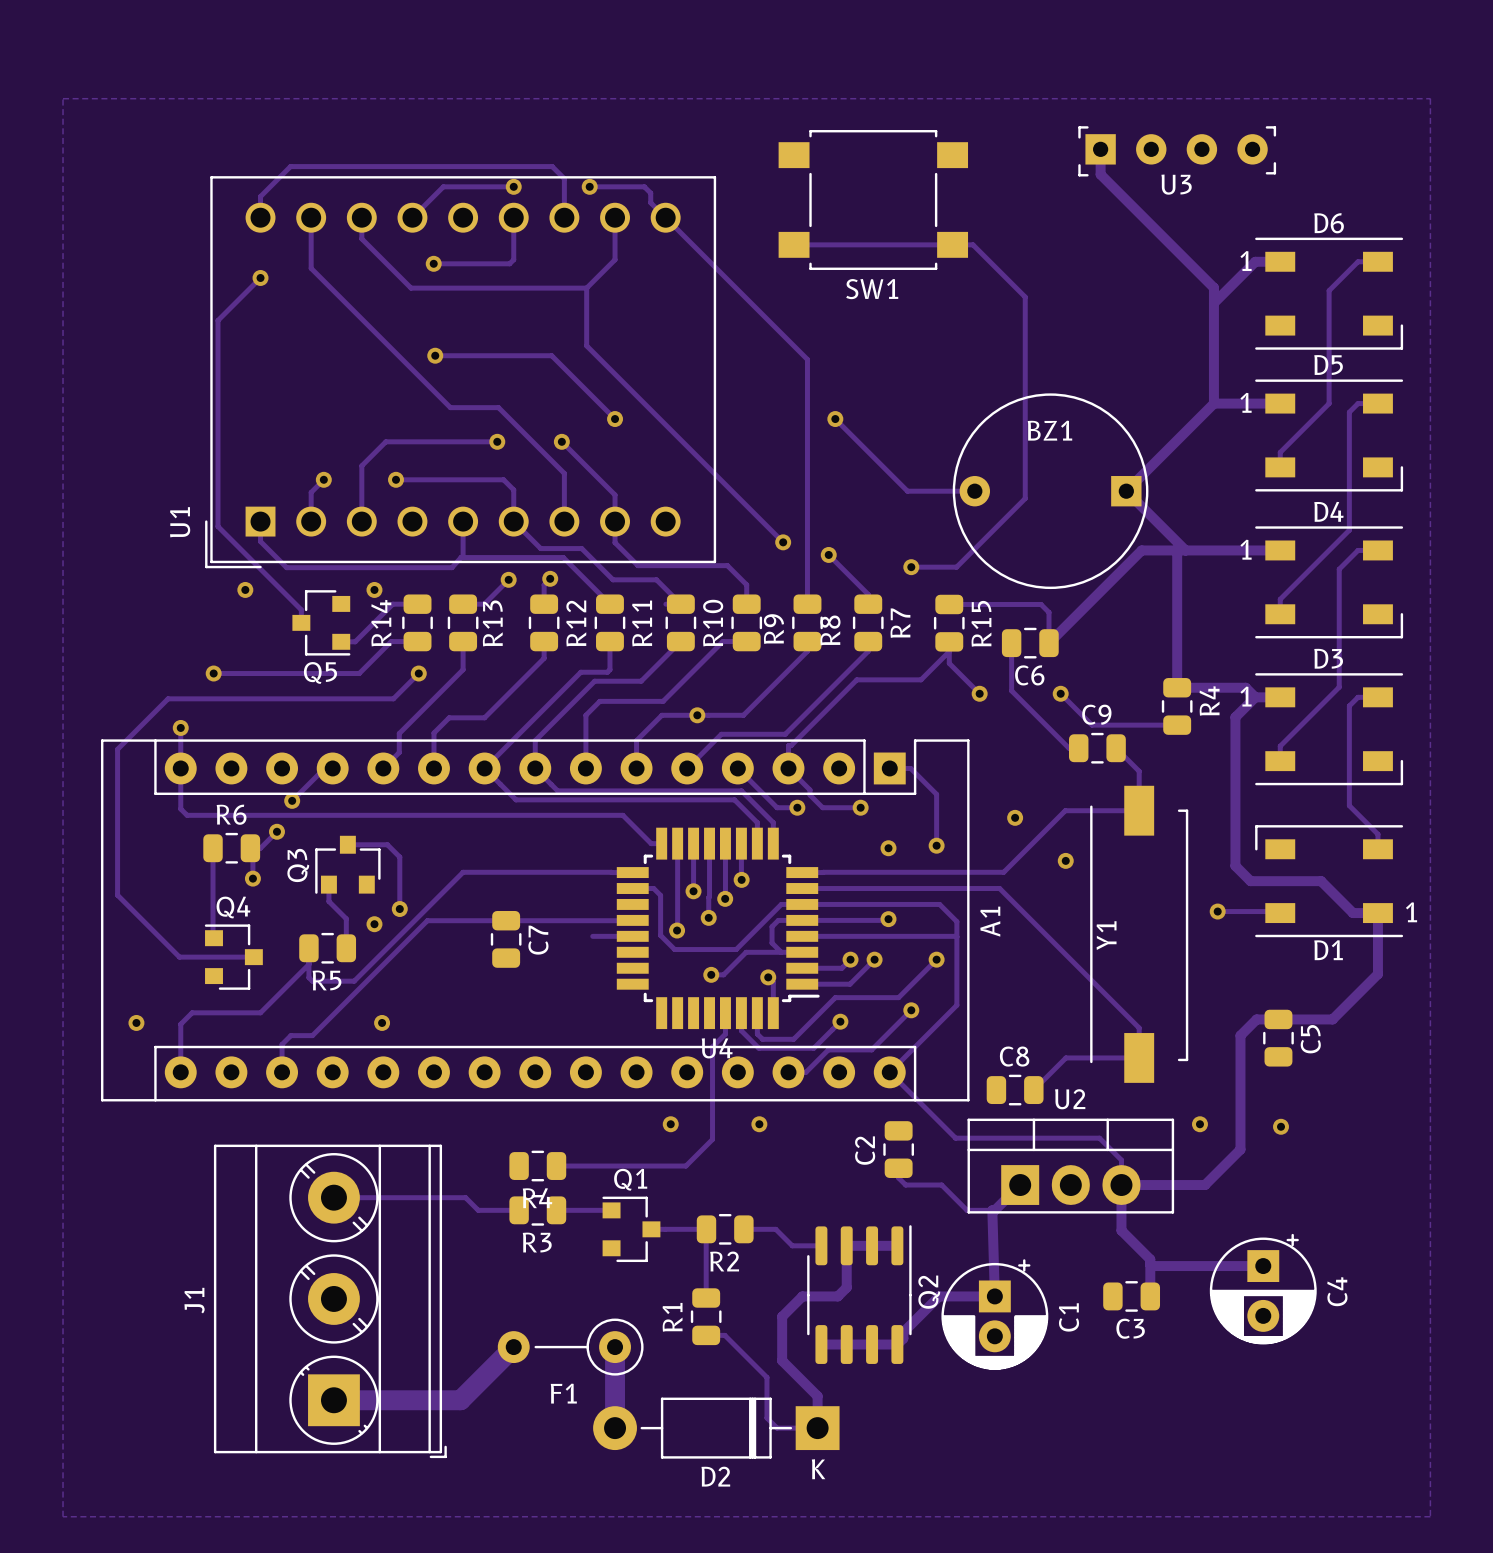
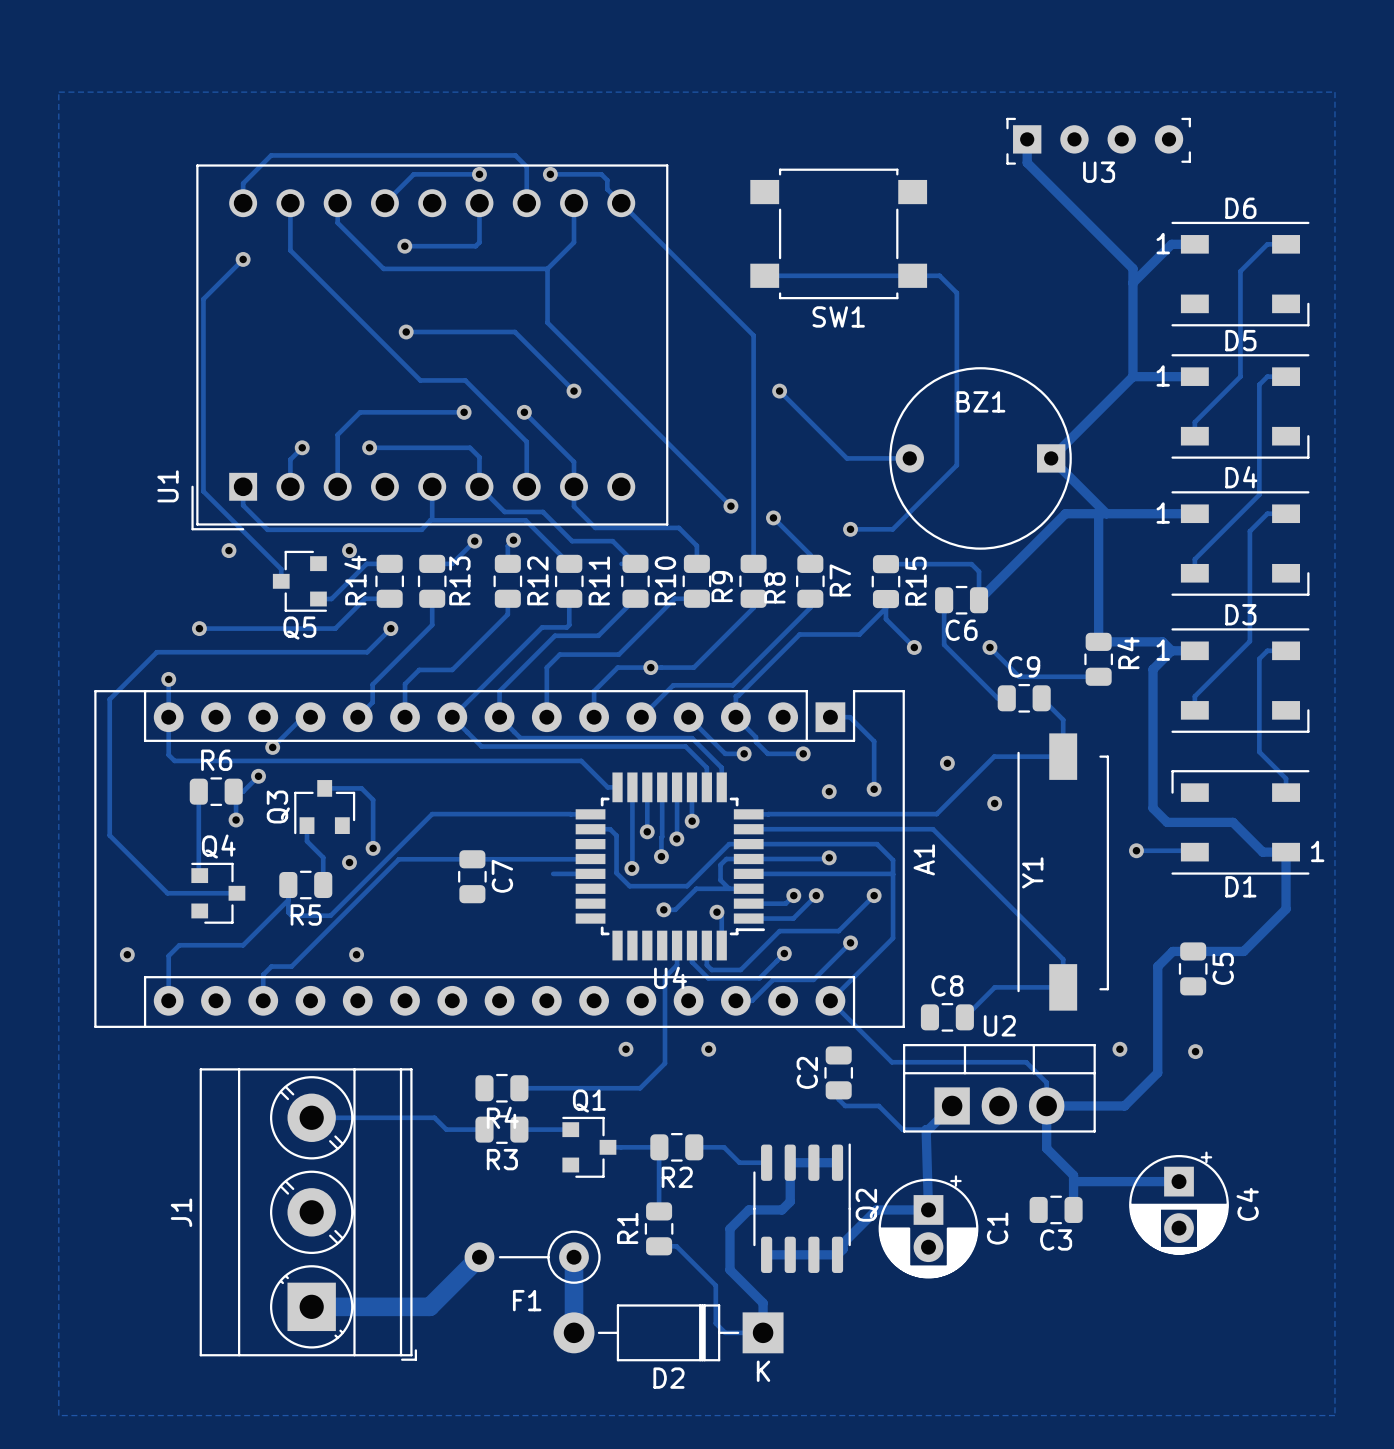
SW1 position: (873, 199) -> (838, 233)
track: (794, 244) (973, 244) (1025, 297) (1025, 313) -> (764, 275) (939, 275) (956, 293)

